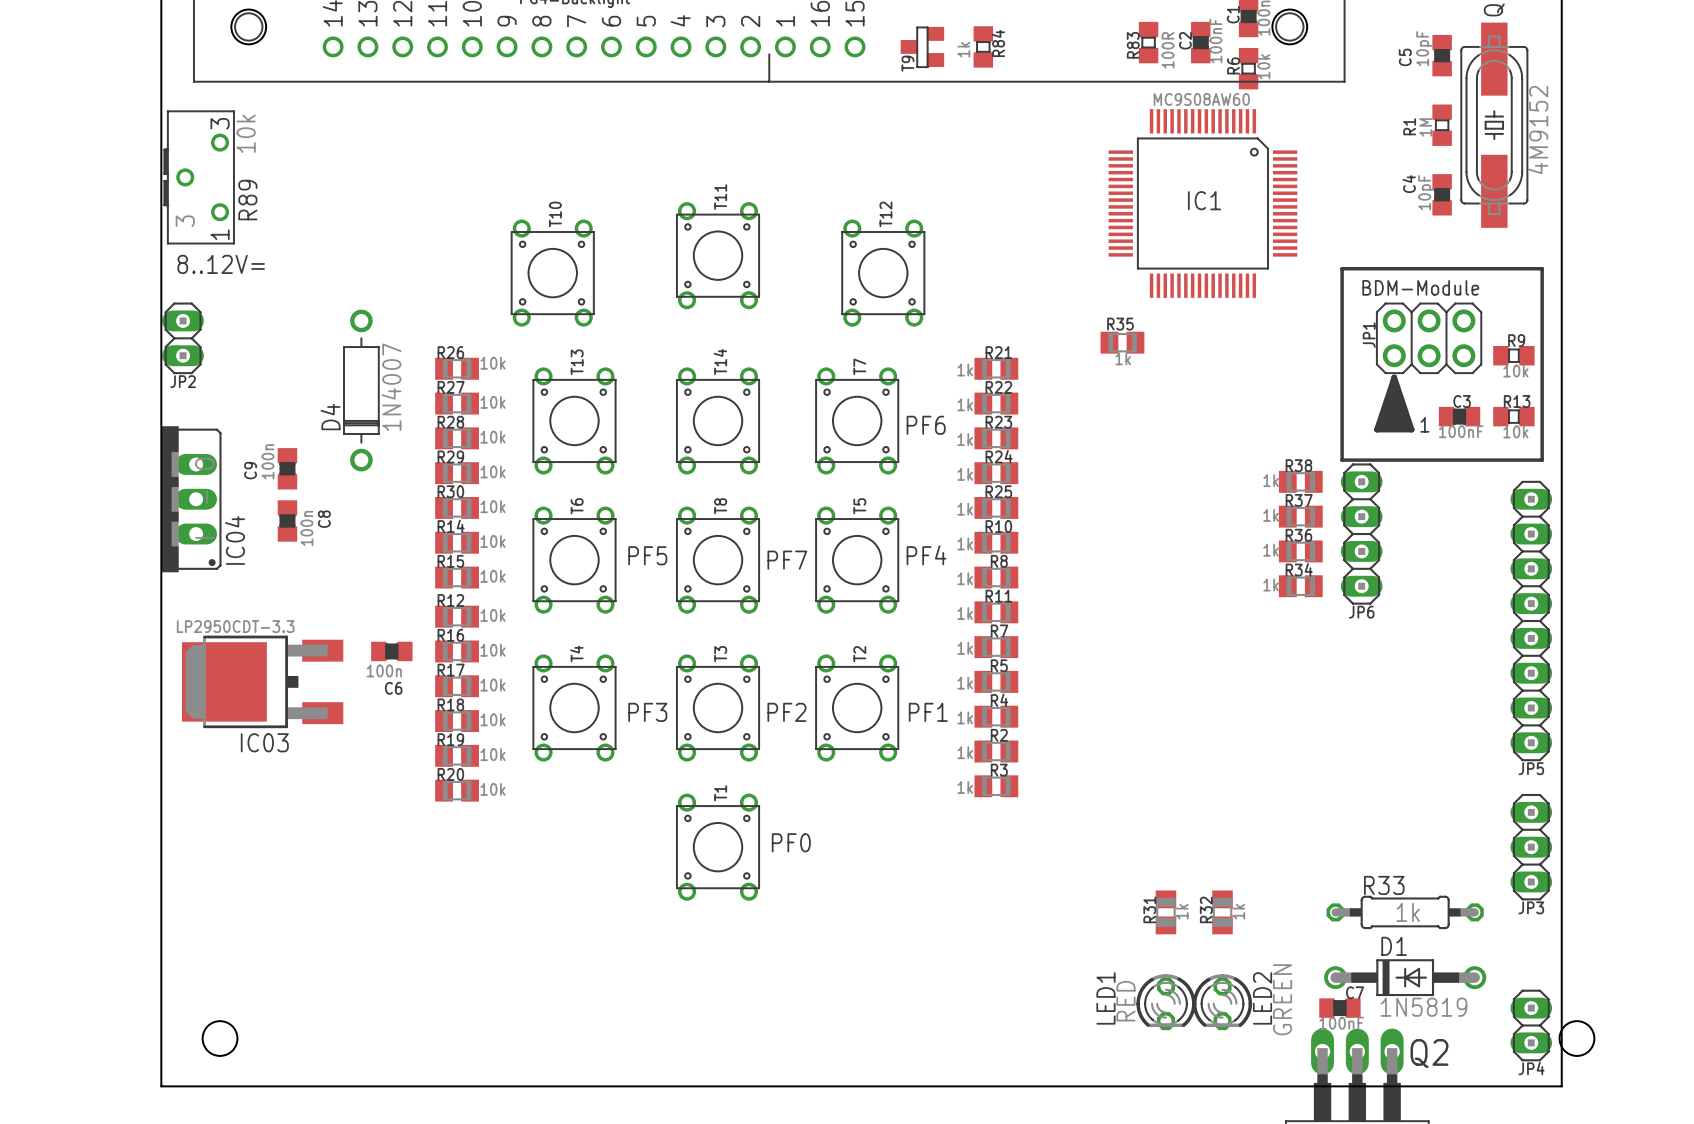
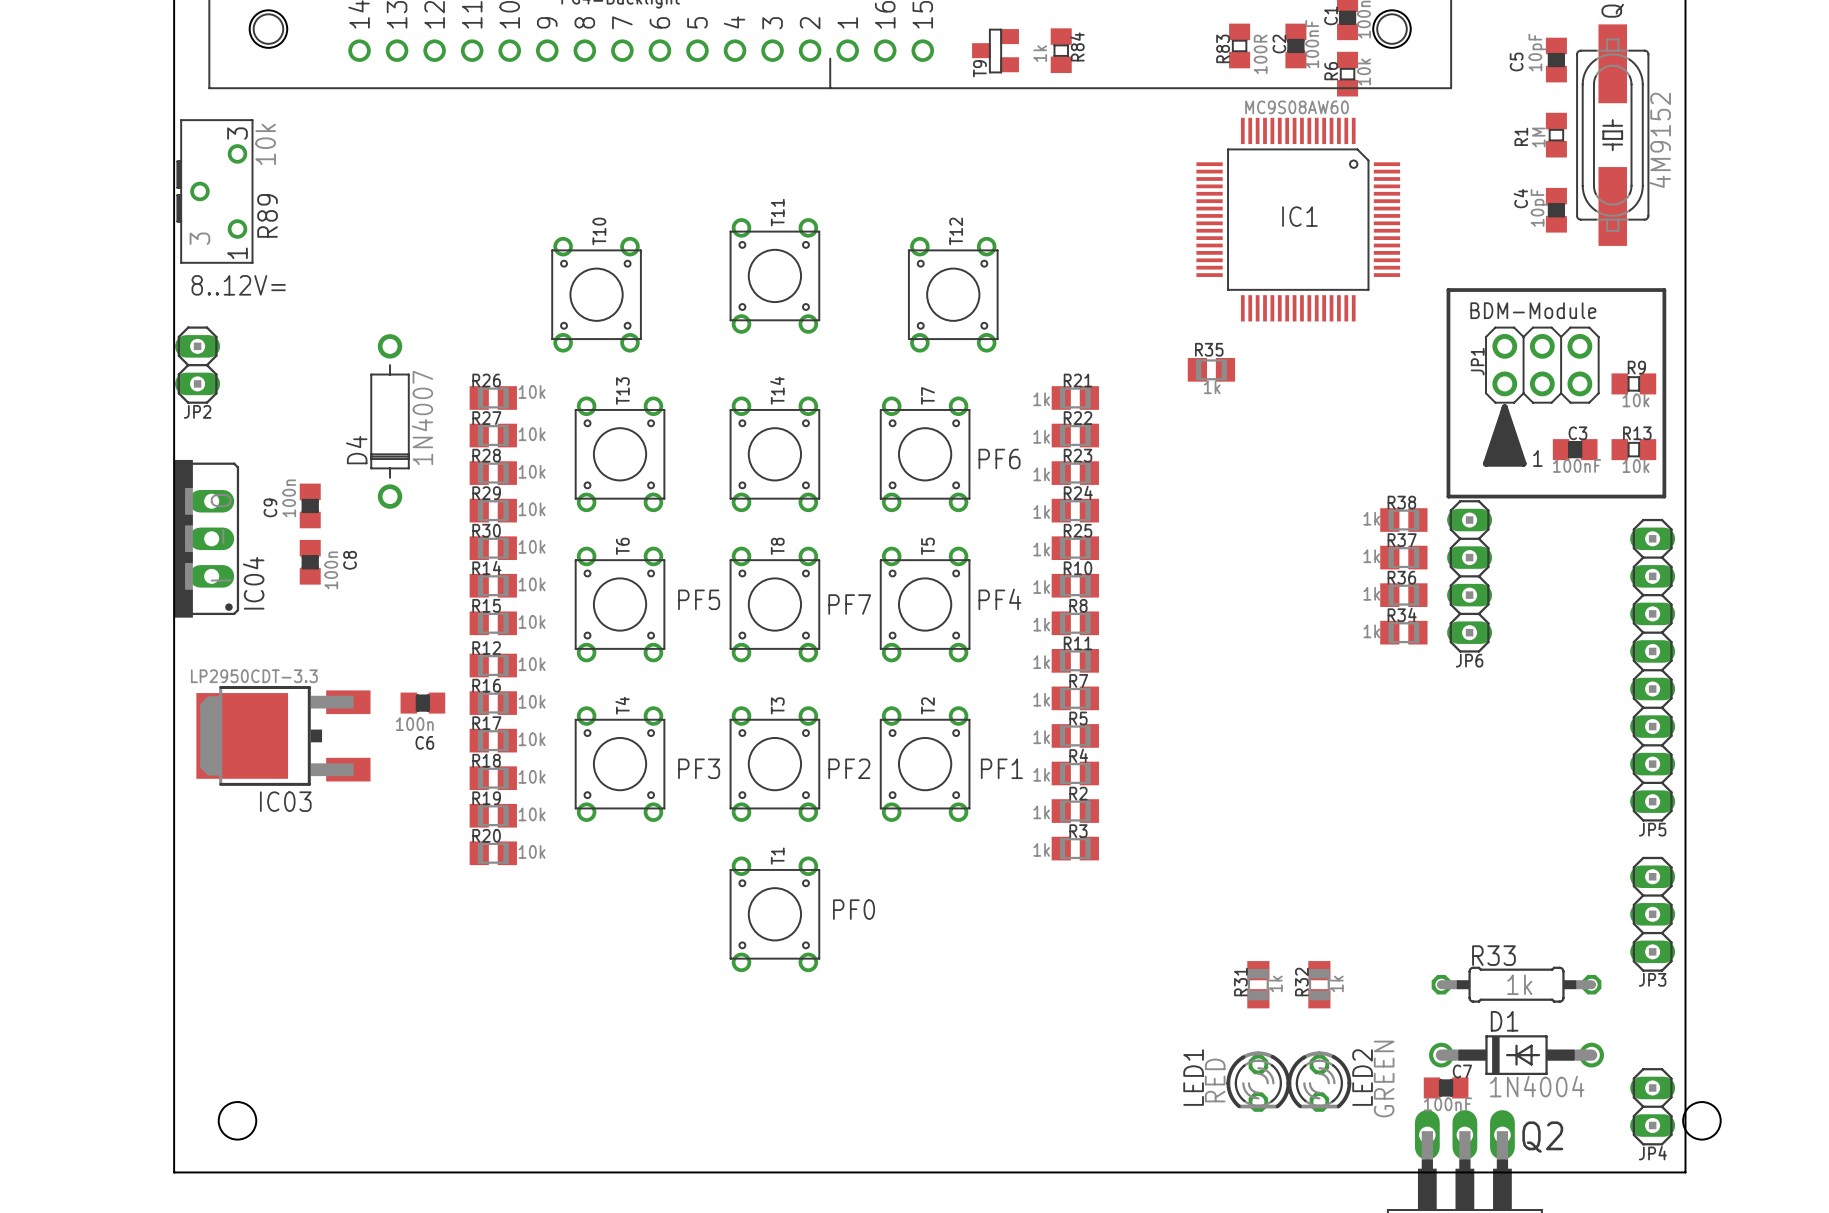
D1 value: 1N5819 (1423, 1007) -> 1N4004 (1537, 1086)

